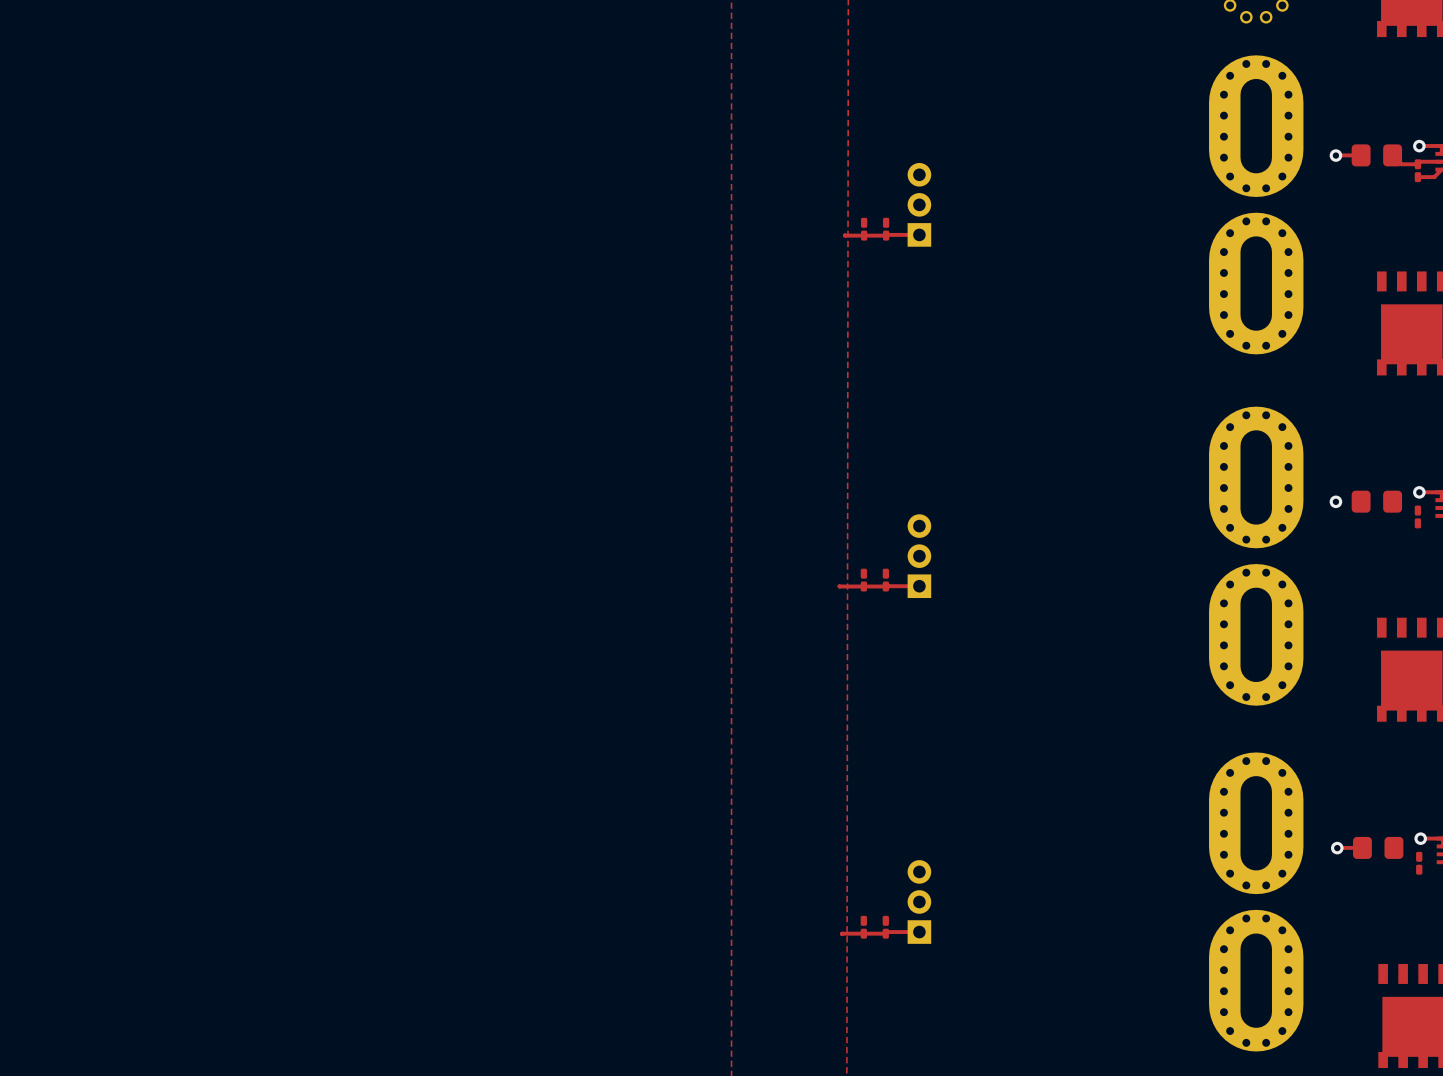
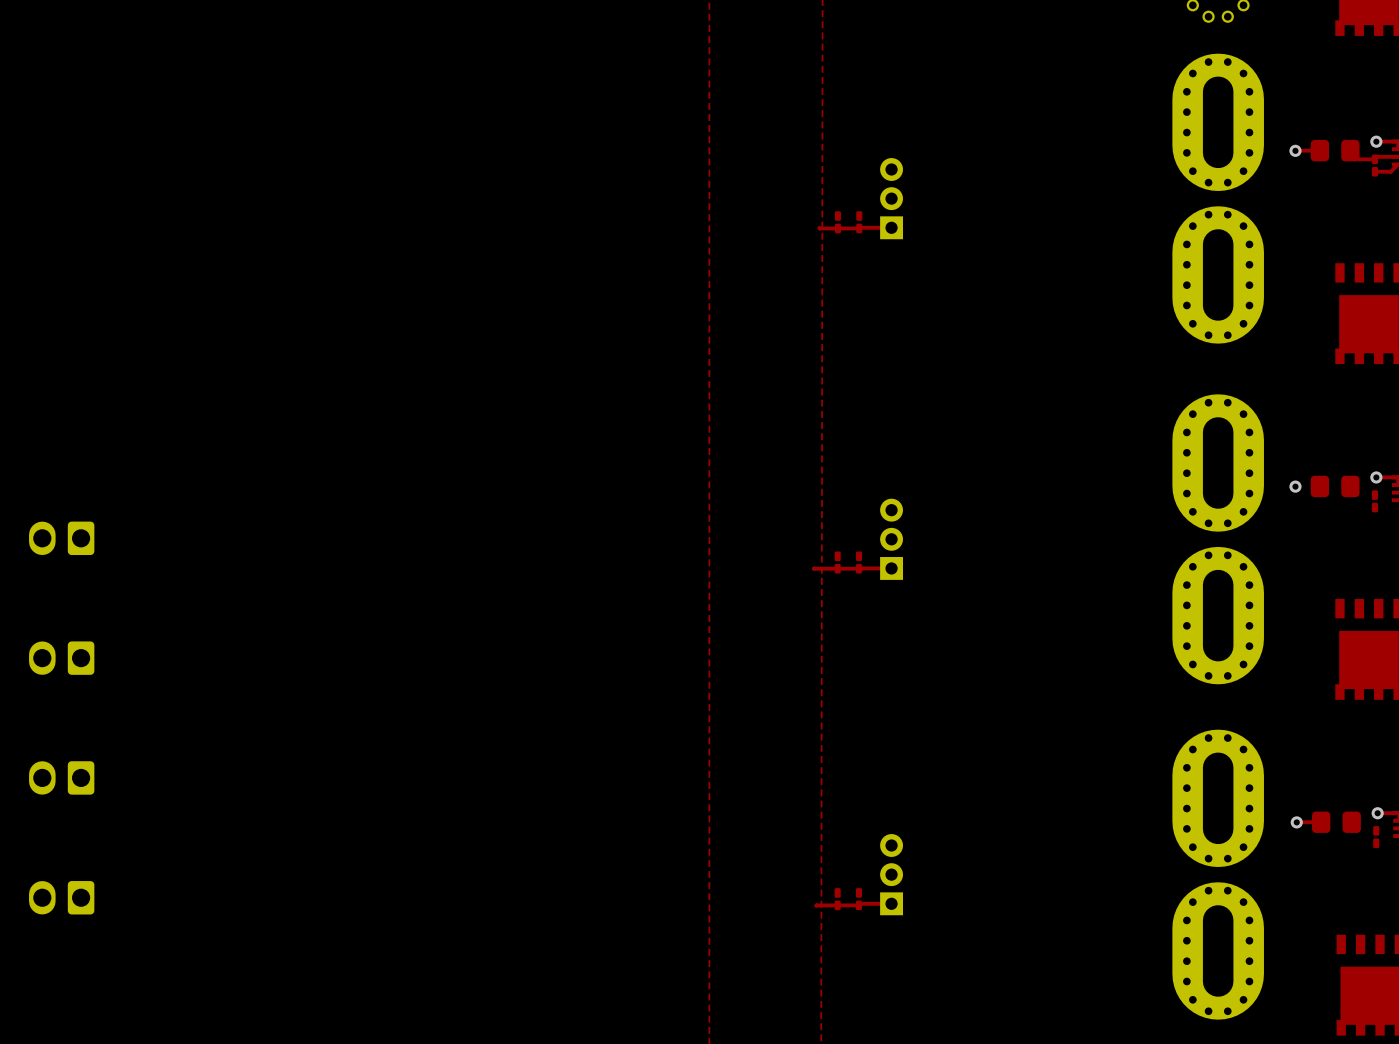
part: none -> (61, 538)
part: none -> (61, 658)
part: none -> (61, 777)
part: none -> (61, 897)

